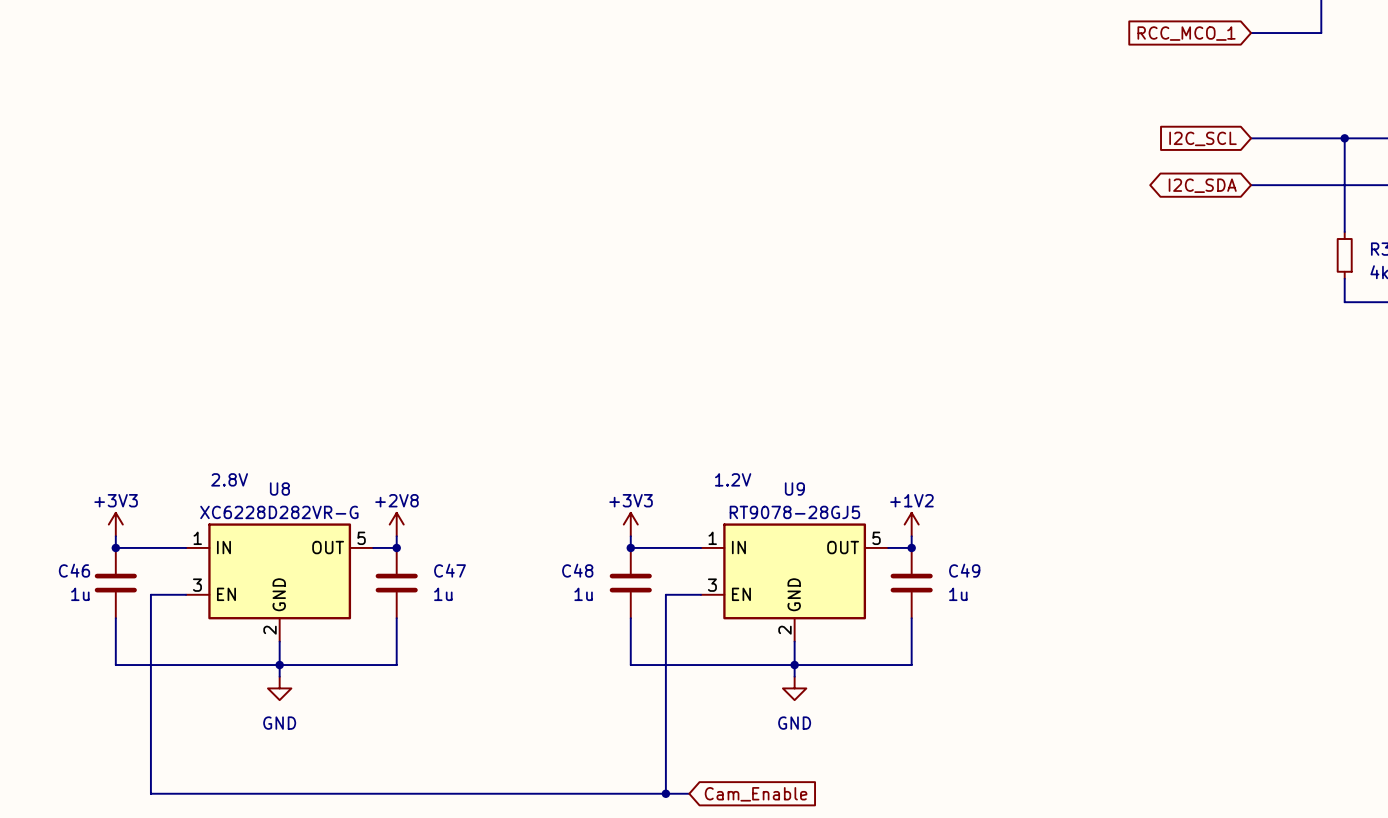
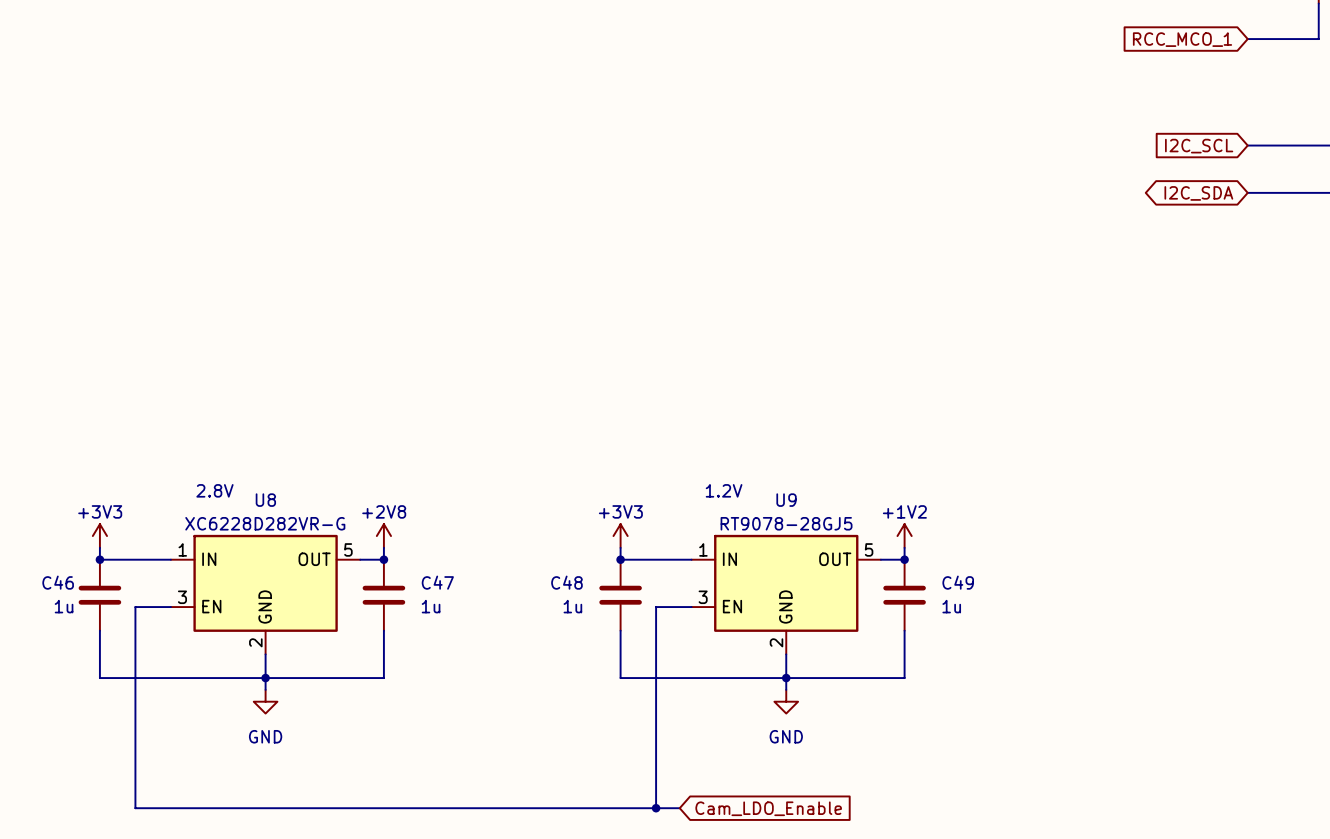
global label: Cam_Enable (756, 794) -> Cam_LDO_Enable (768, 808)

